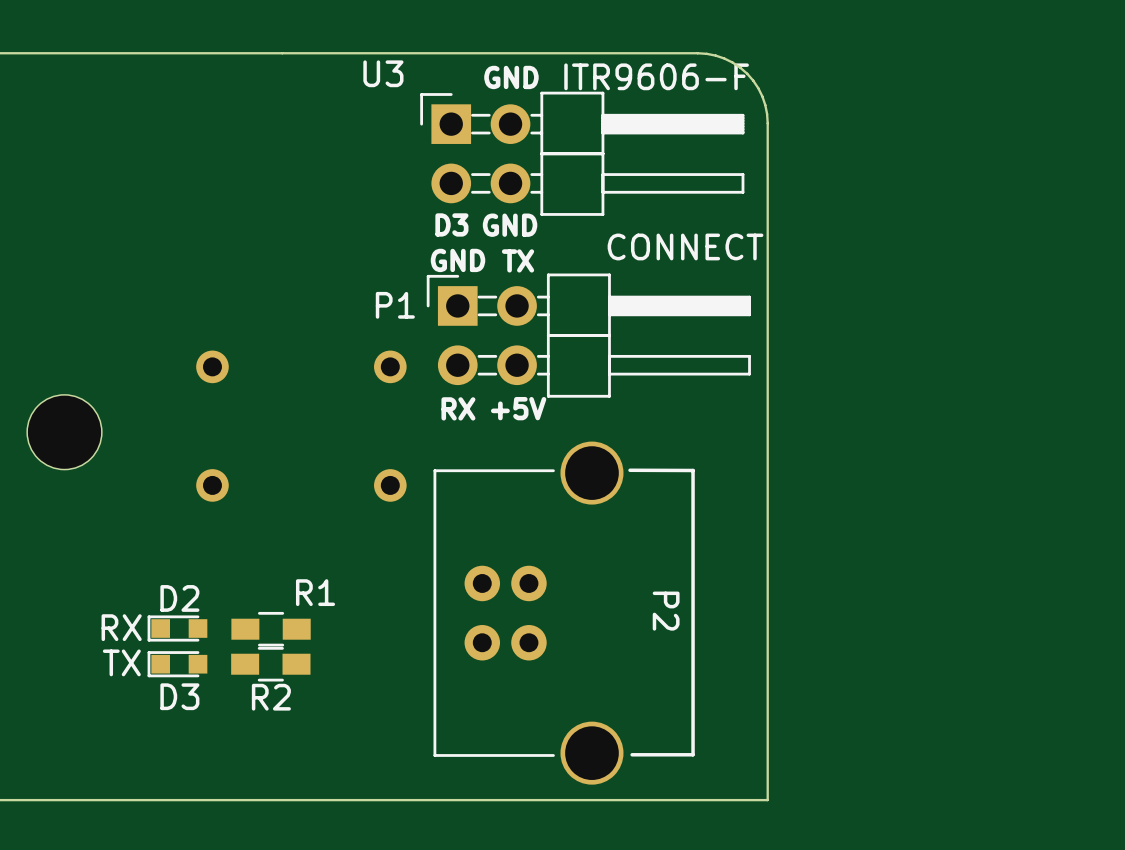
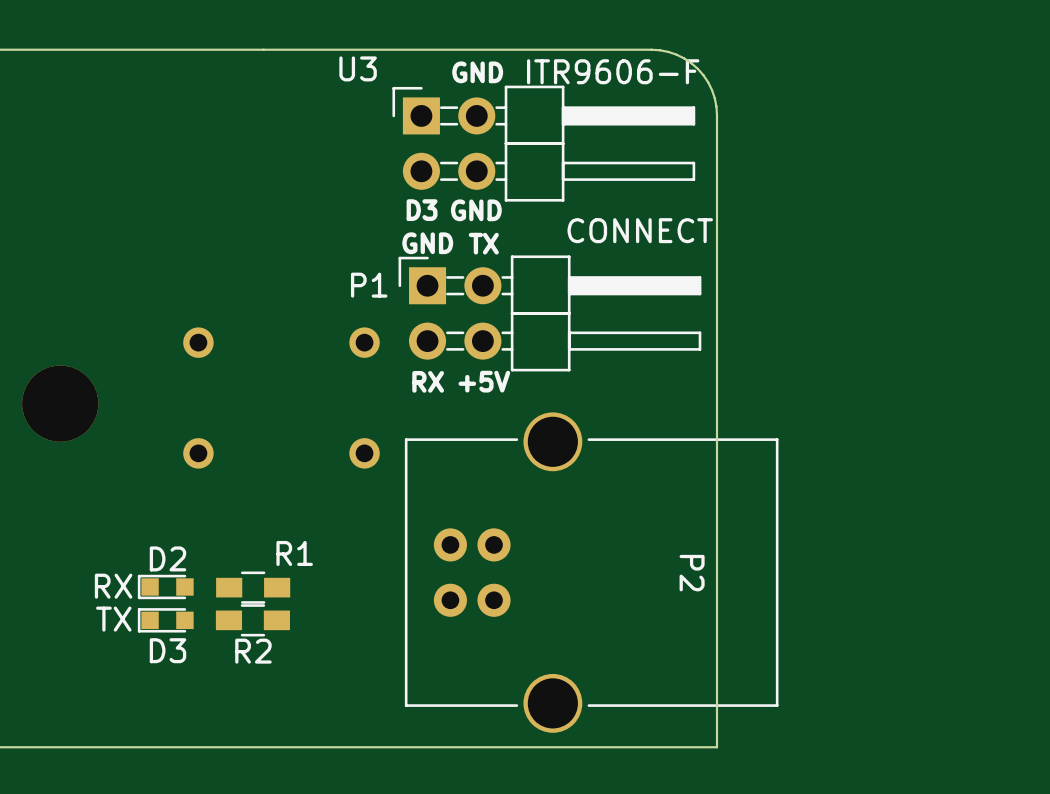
part footprint: [27, 394, 102, 470] -> [22, 365, 99, 442]
P2 footprint: [433, 441, 695, 785] -> [404, 412, 779, 733]

